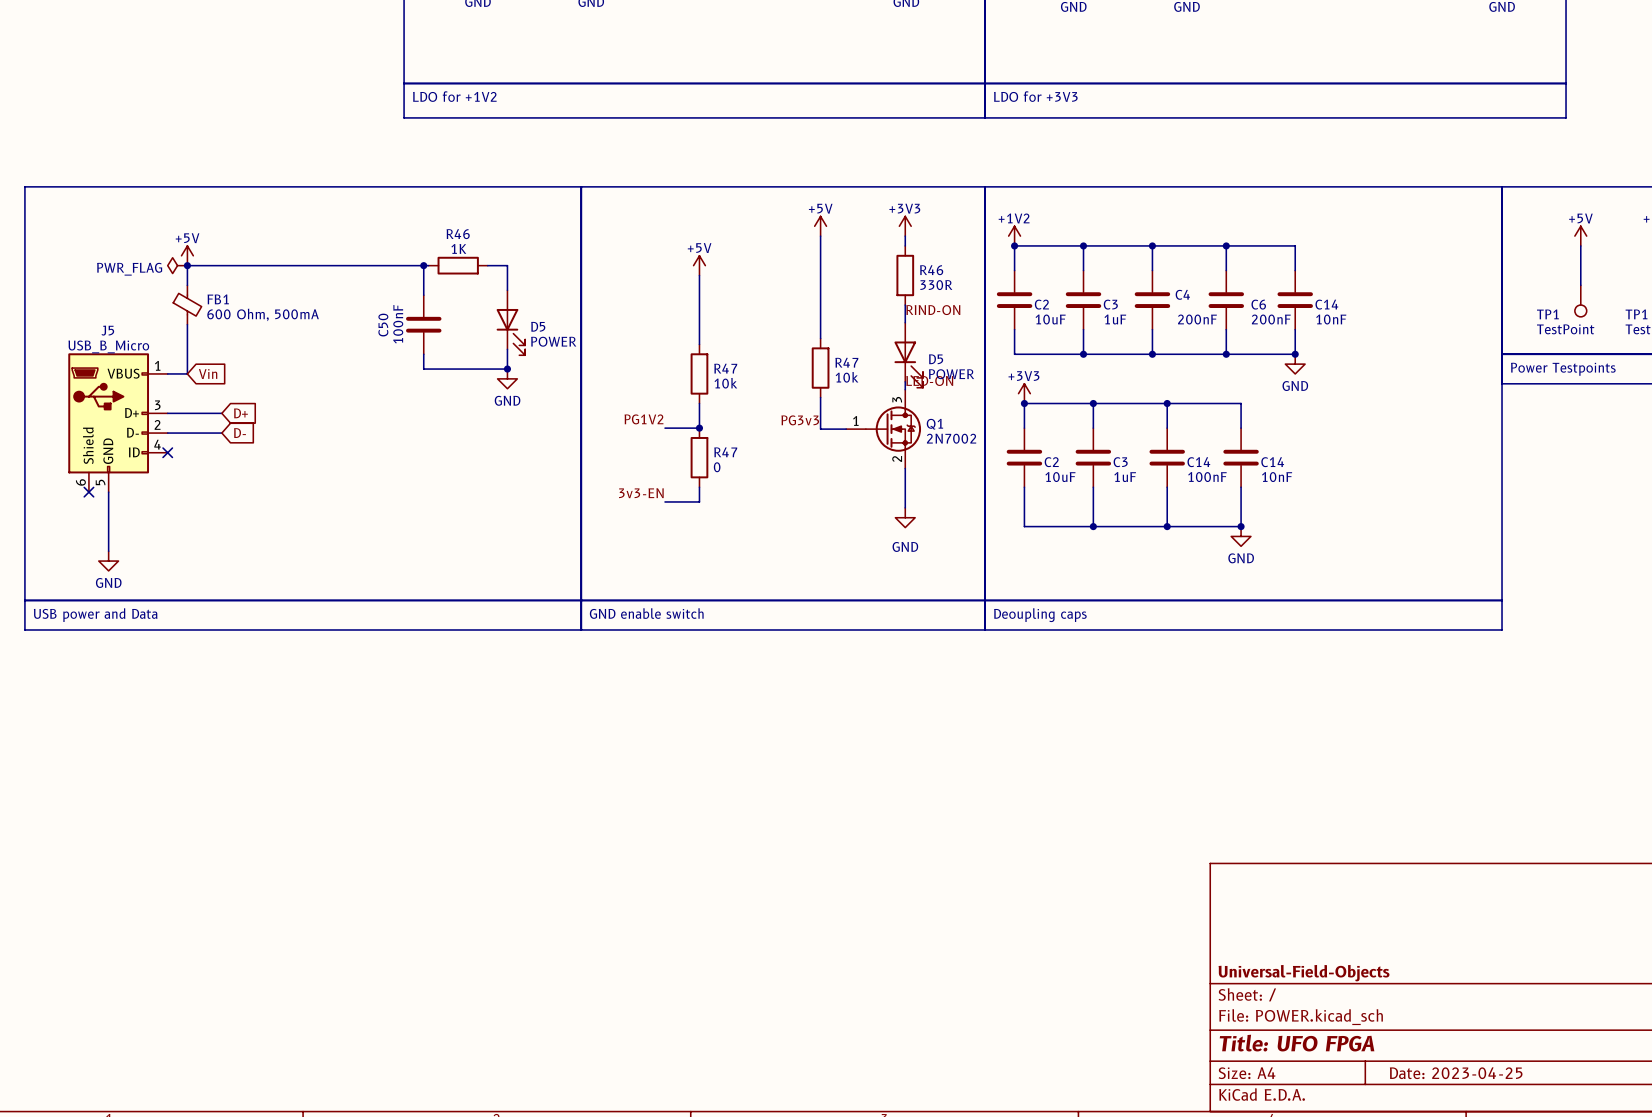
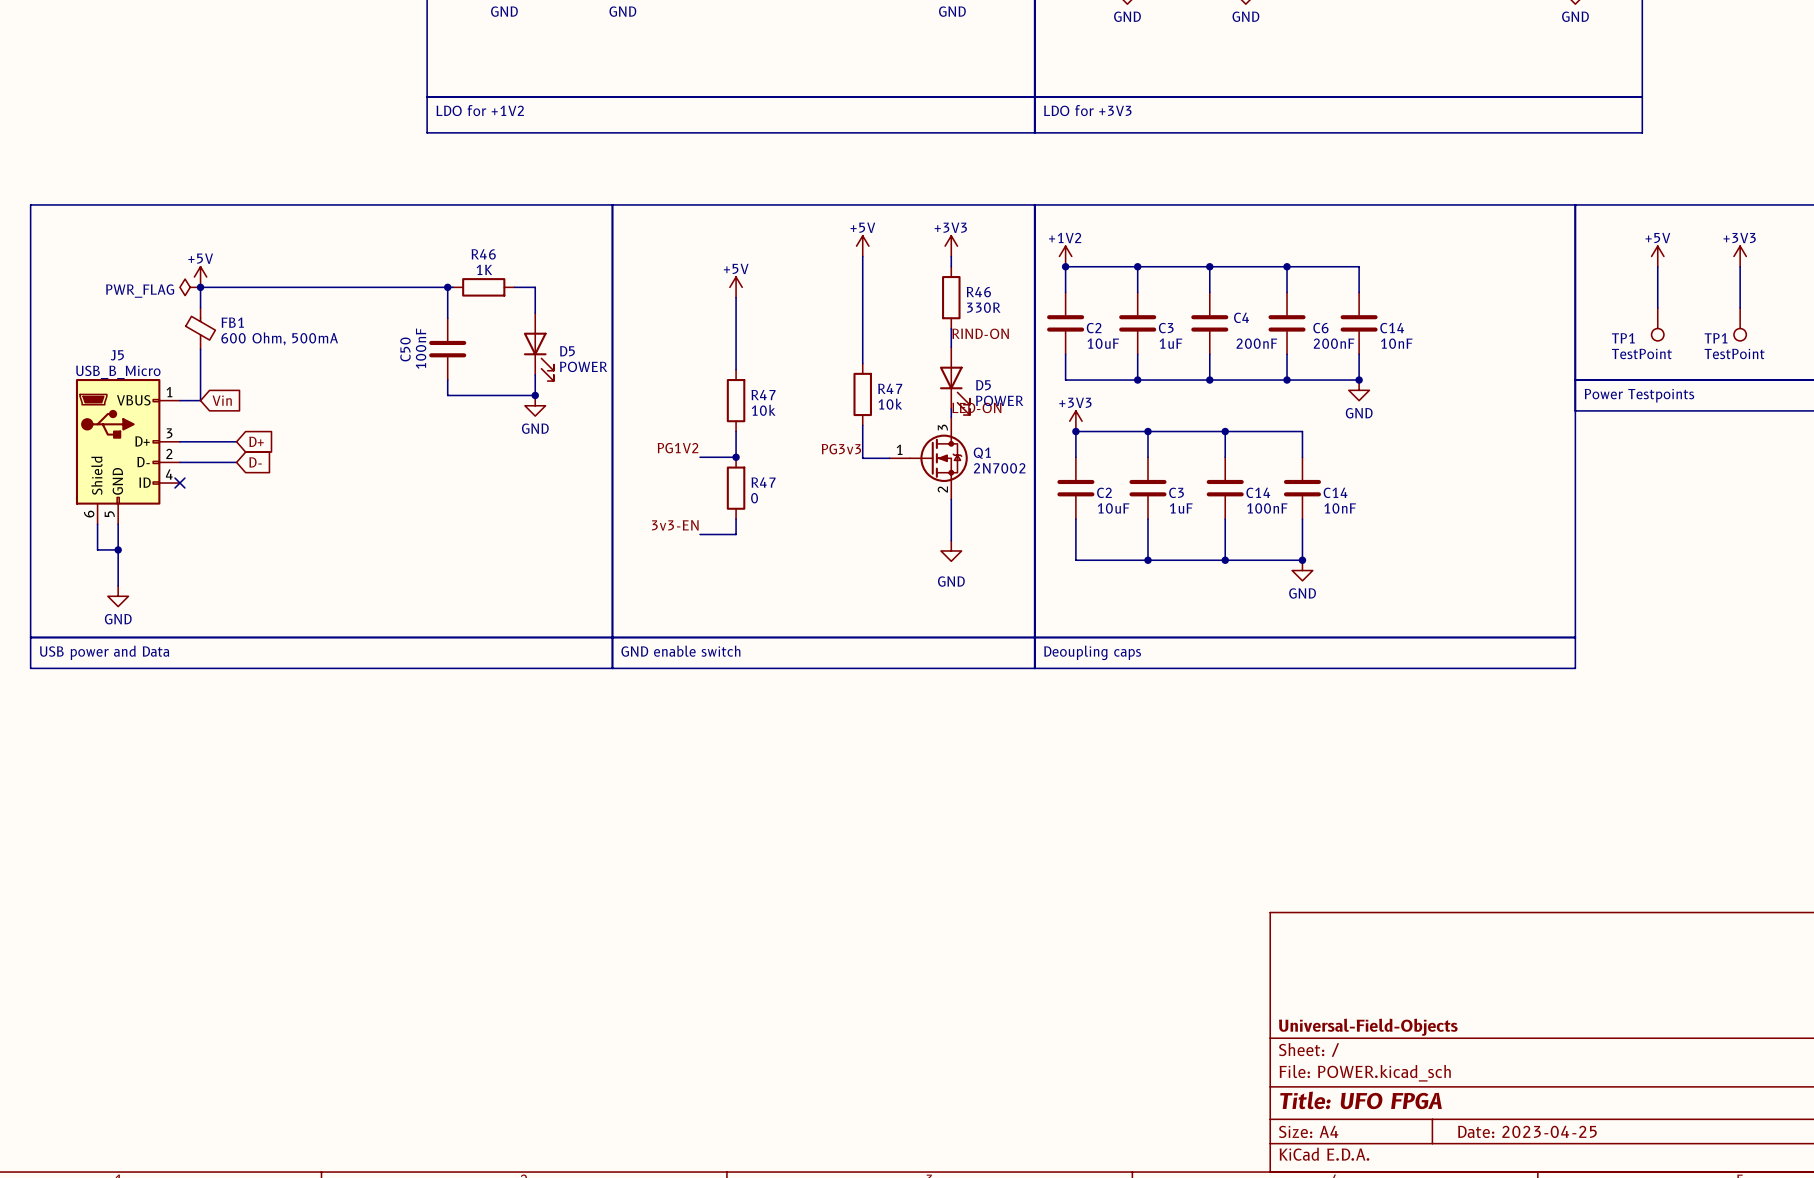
wire: none -> (97, 524) (97, 549) (118, 549)
no-connect mark: (88, 492) -> none
junction: none -> (118, 549)

